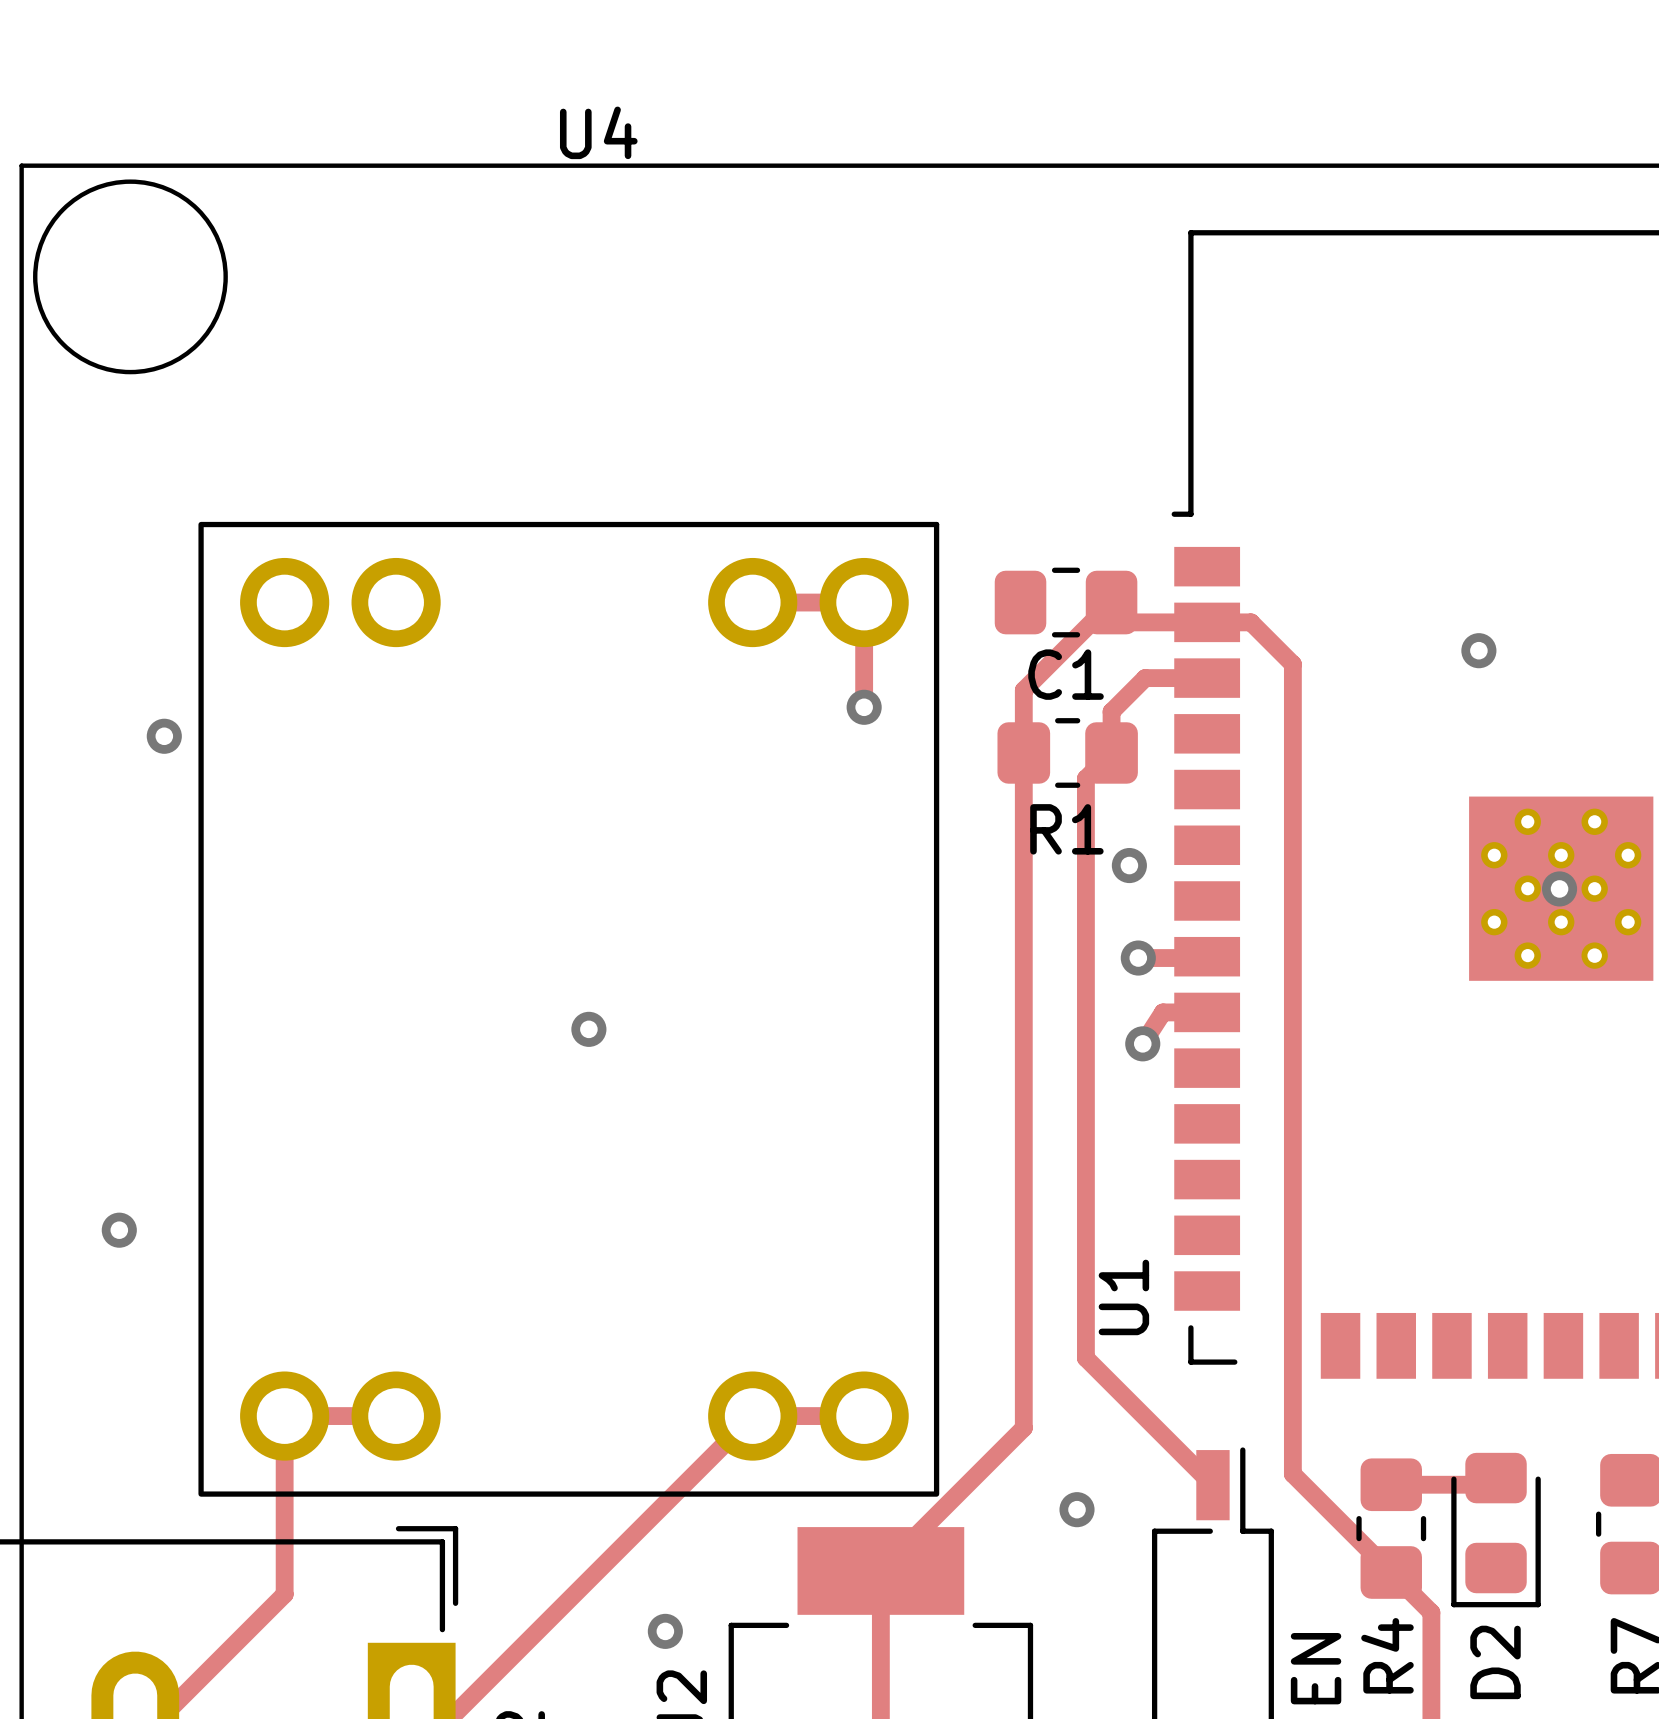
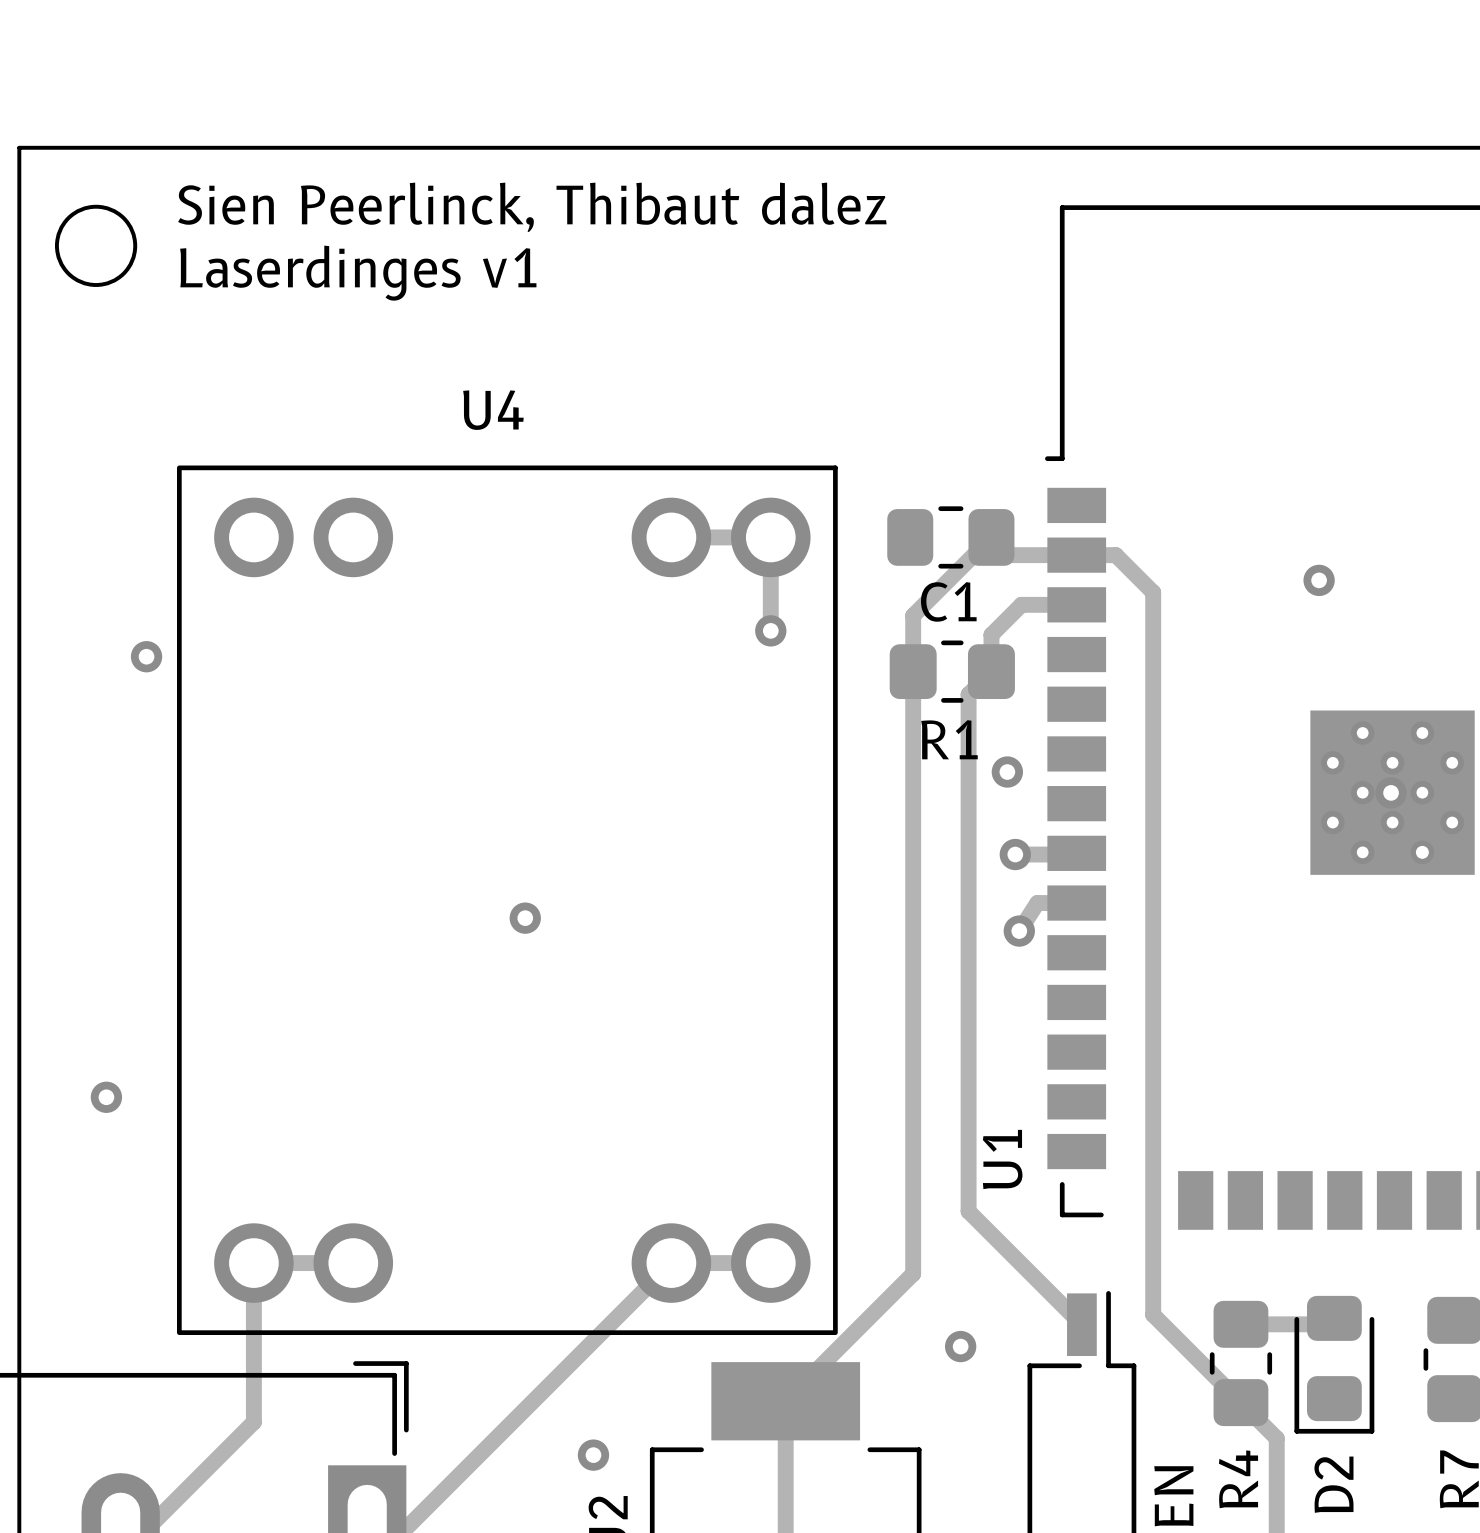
U4 name position: U4 (598, 132) -> U4 (493, 410)
round board edge size: [33, 179, 228, 375] -> [54, 204, 138, 287]
text: none -> Sien Peerlinck, Thibaut dalez (532, 207)
text: none -> Laserdinges v1 (358, 273)

